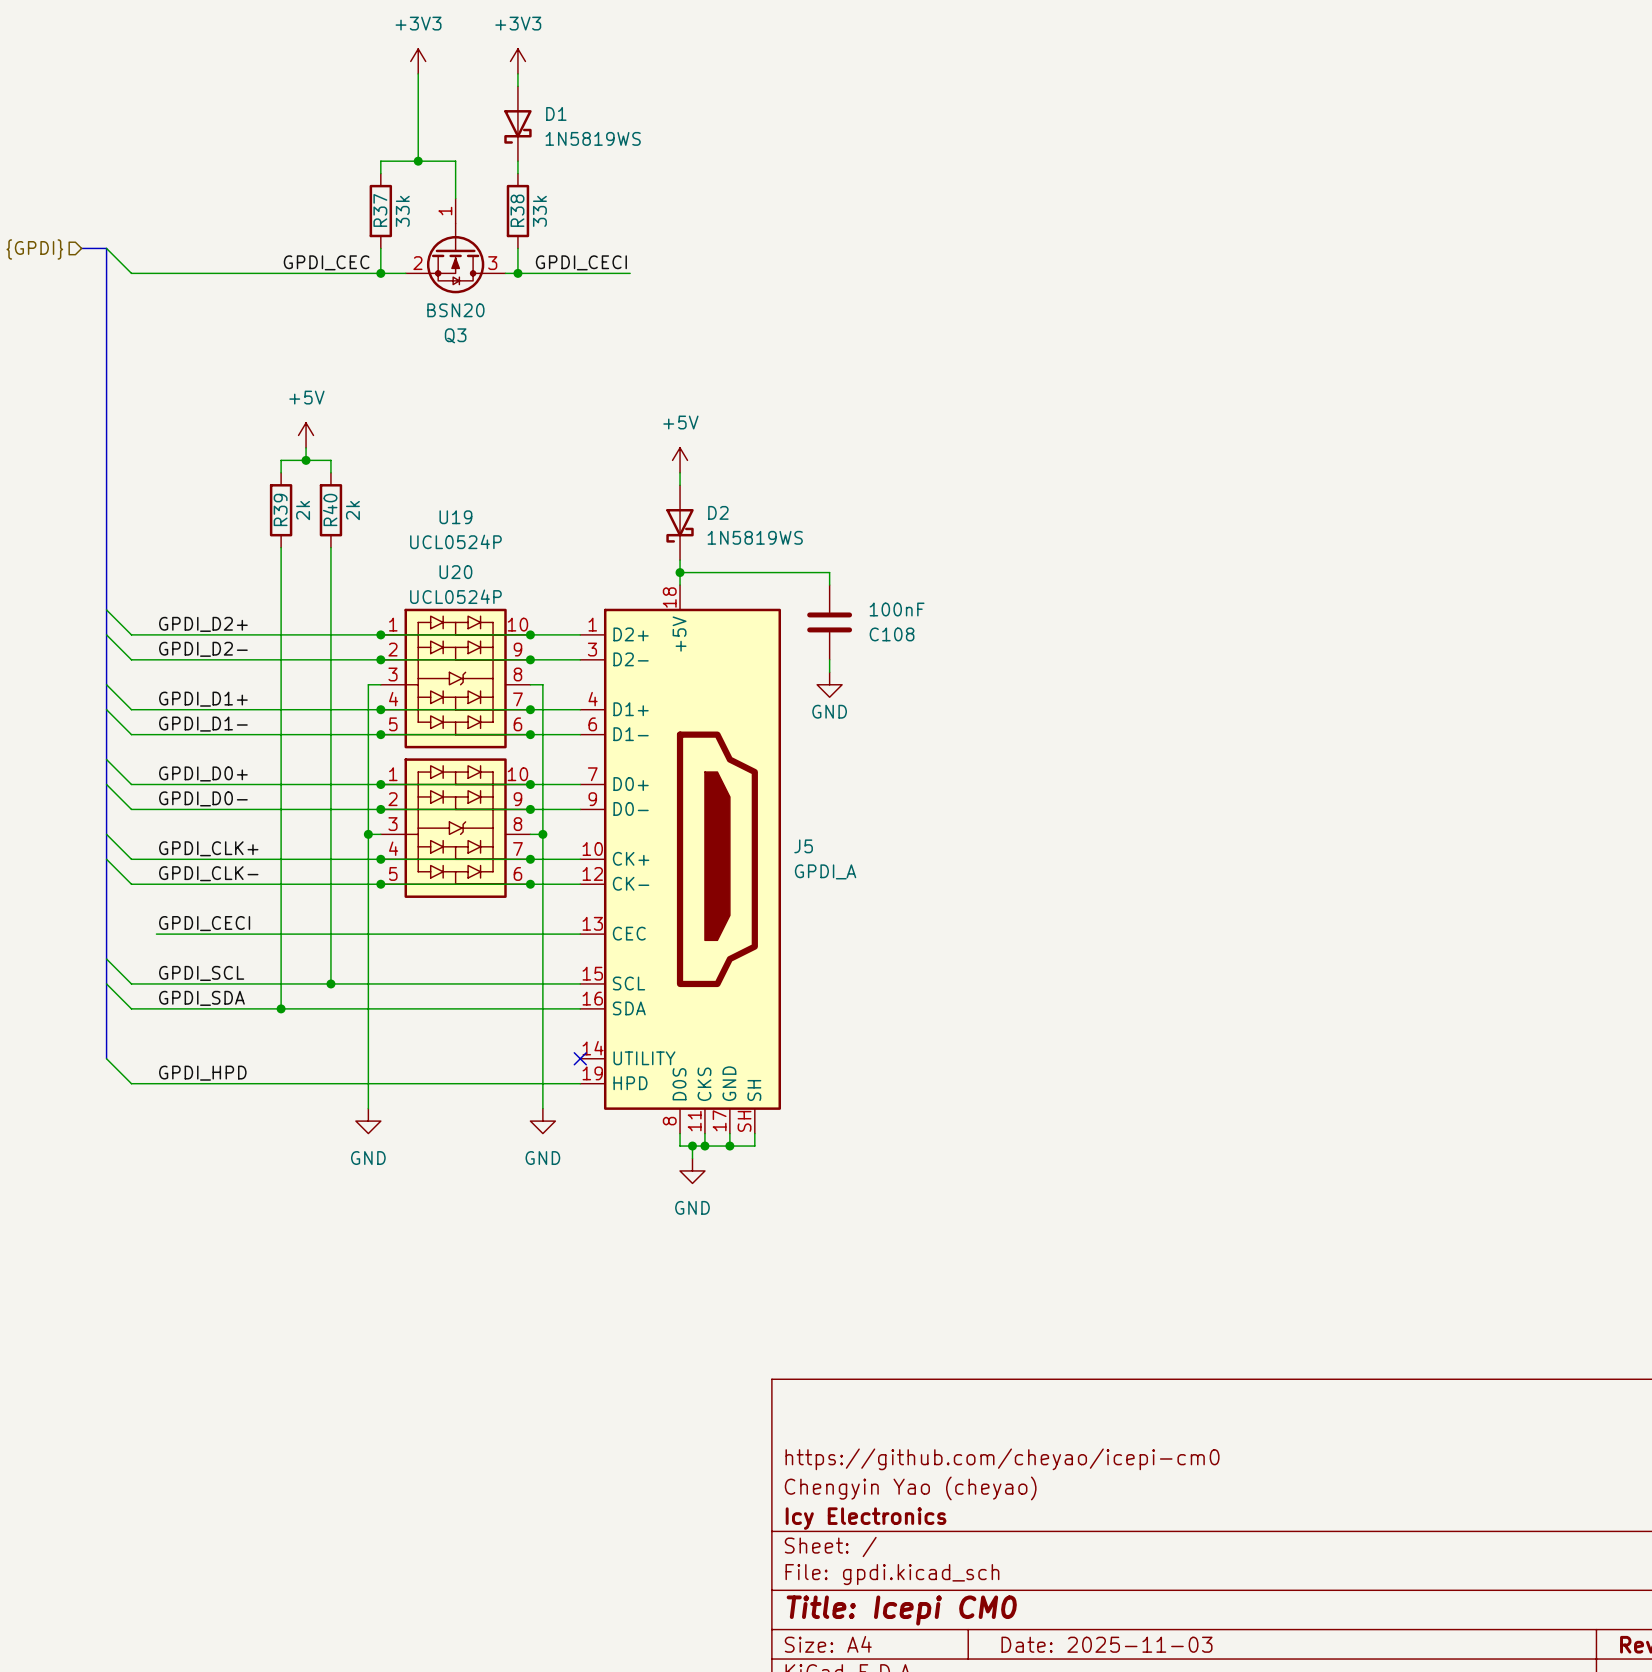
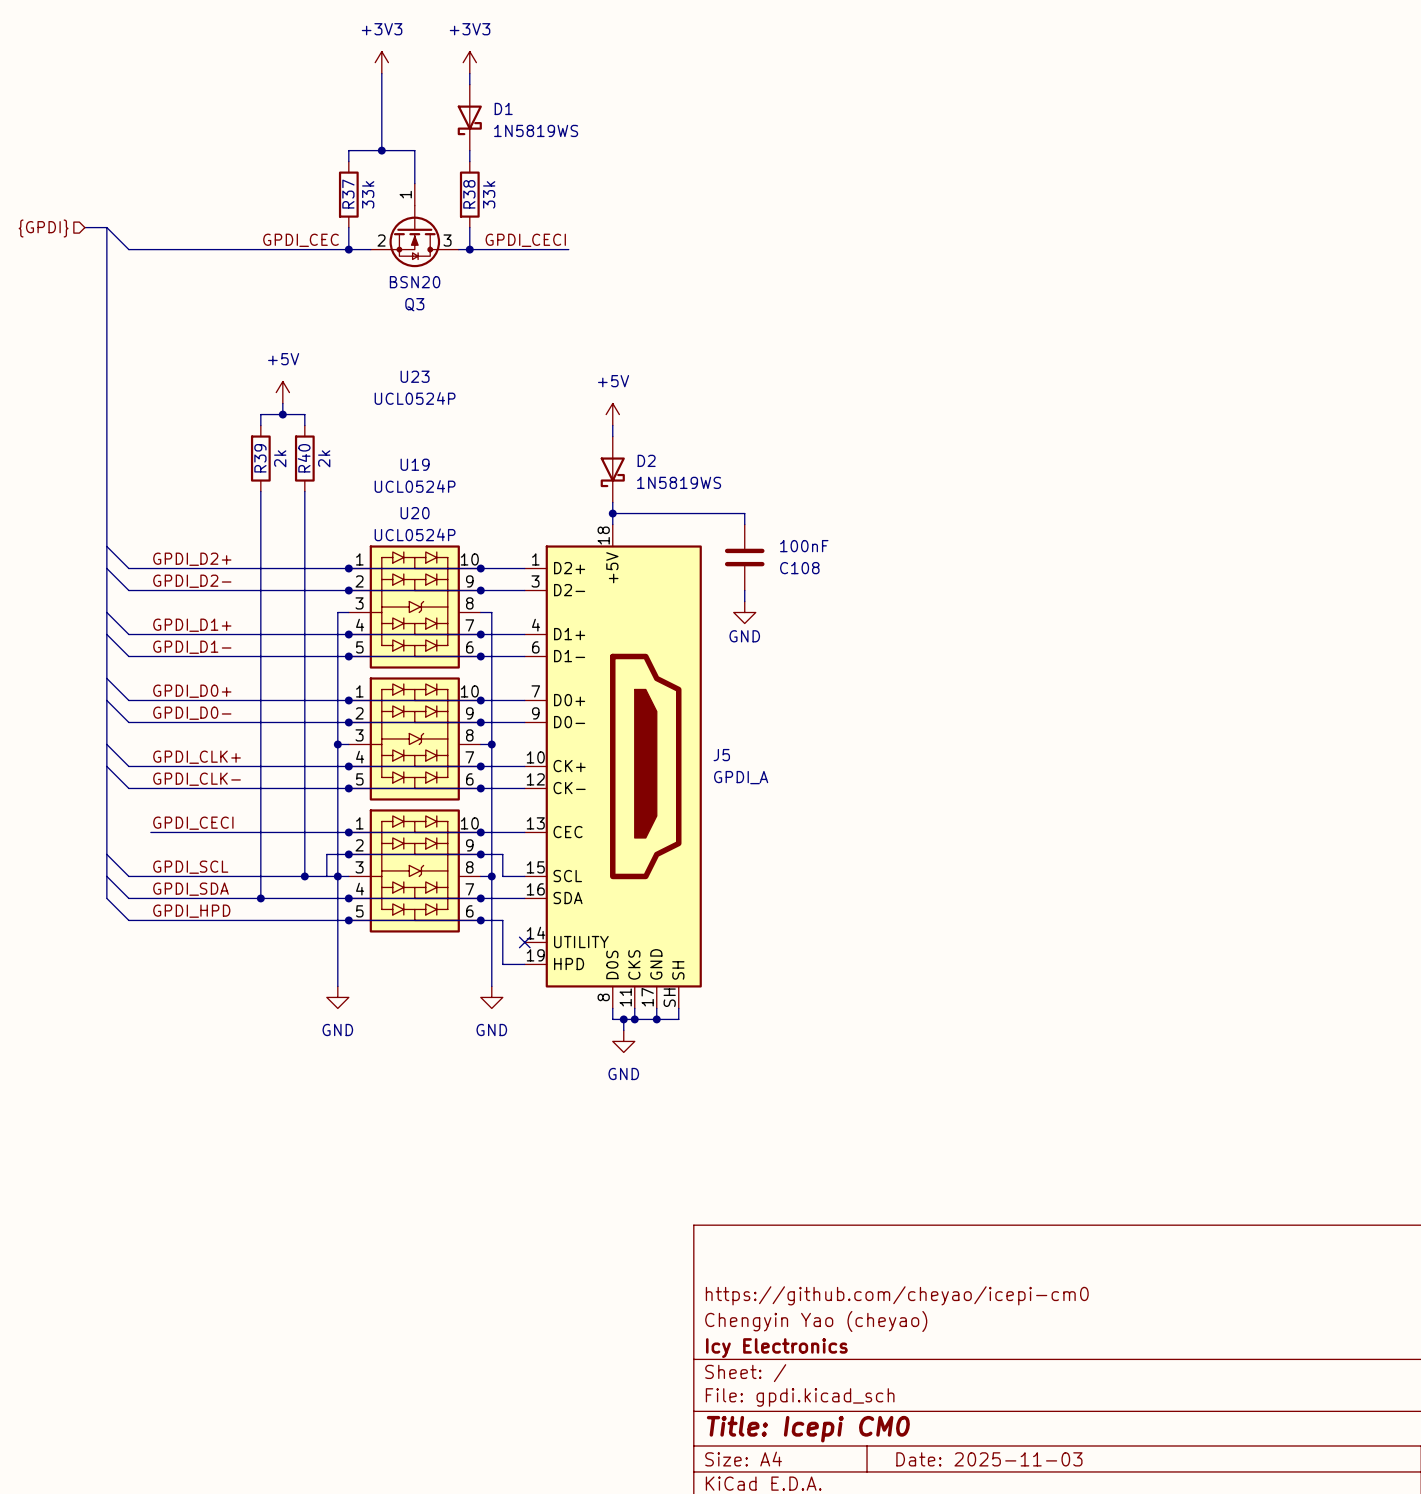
junction: none -> (348, 832)
junction: none -> (480, 832)
junction: none -> (348, 854)
junction: none -> (480, 854)
U23: none -> UCL0524P (414, 870)
junction: none -> (337, 876)
wire: (542, 983) (555, 983) -> (326, 876) (326, 854) (502, 854) (502, 876)
junction: none -> (491, 876)
bus: (106, 1008) (106, 1058) -> none
junction: none -> (348, 898)
junction: none -> (480, 898)
junction: none -> (348, 920)
junction: none -> (480, 920)
wire: (106, 1058) (131, 1083) (555, 1083) -> (106, 898) (128, 920) (502, 920) (502, 964)
label position: GPDI_HPD (202, 1073) -> GPDI_HPD (191, 911)

